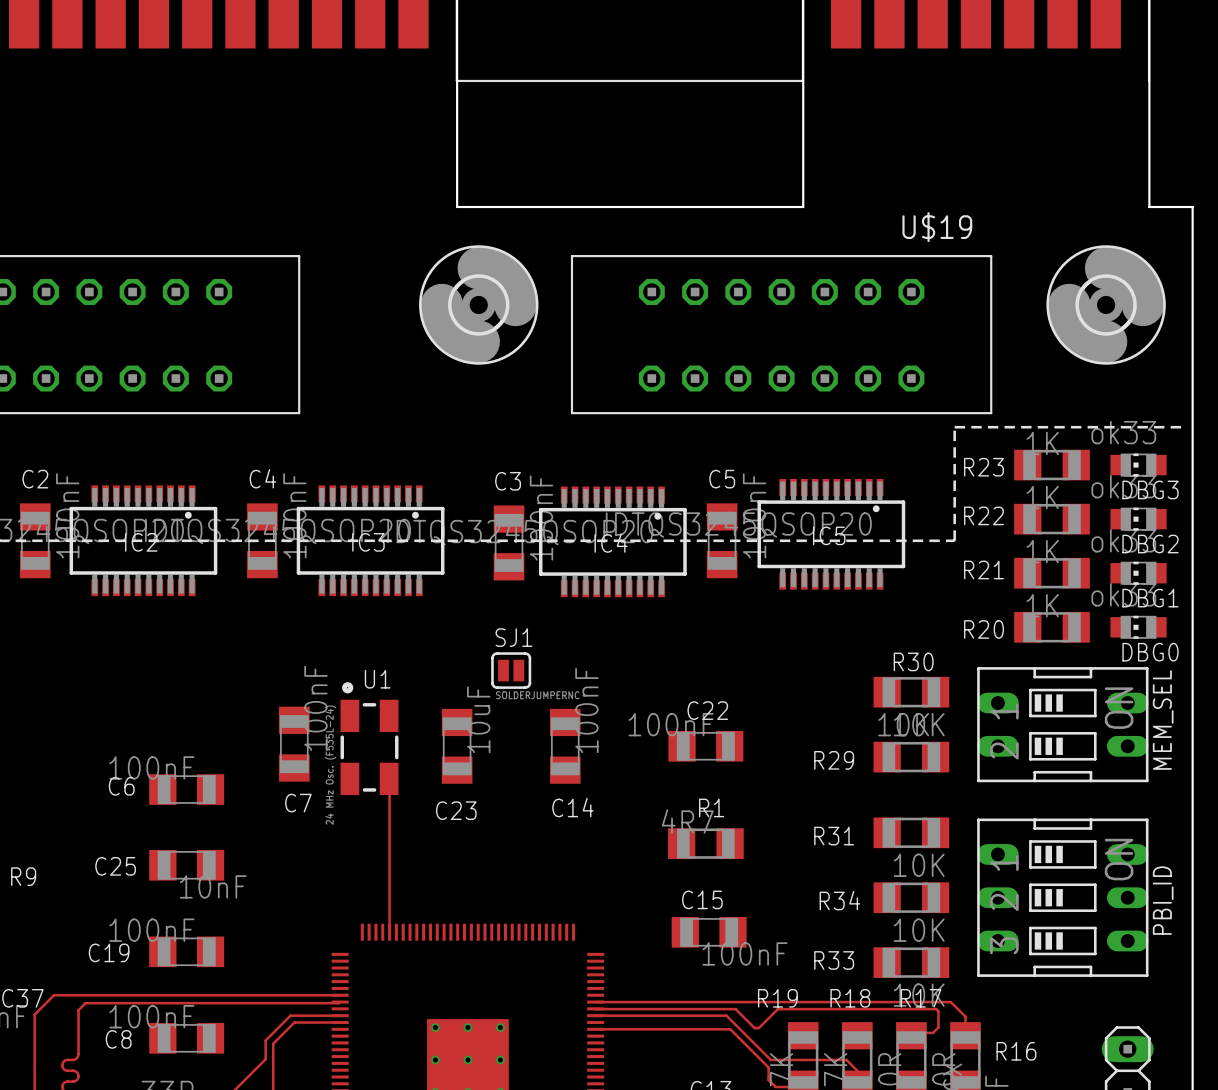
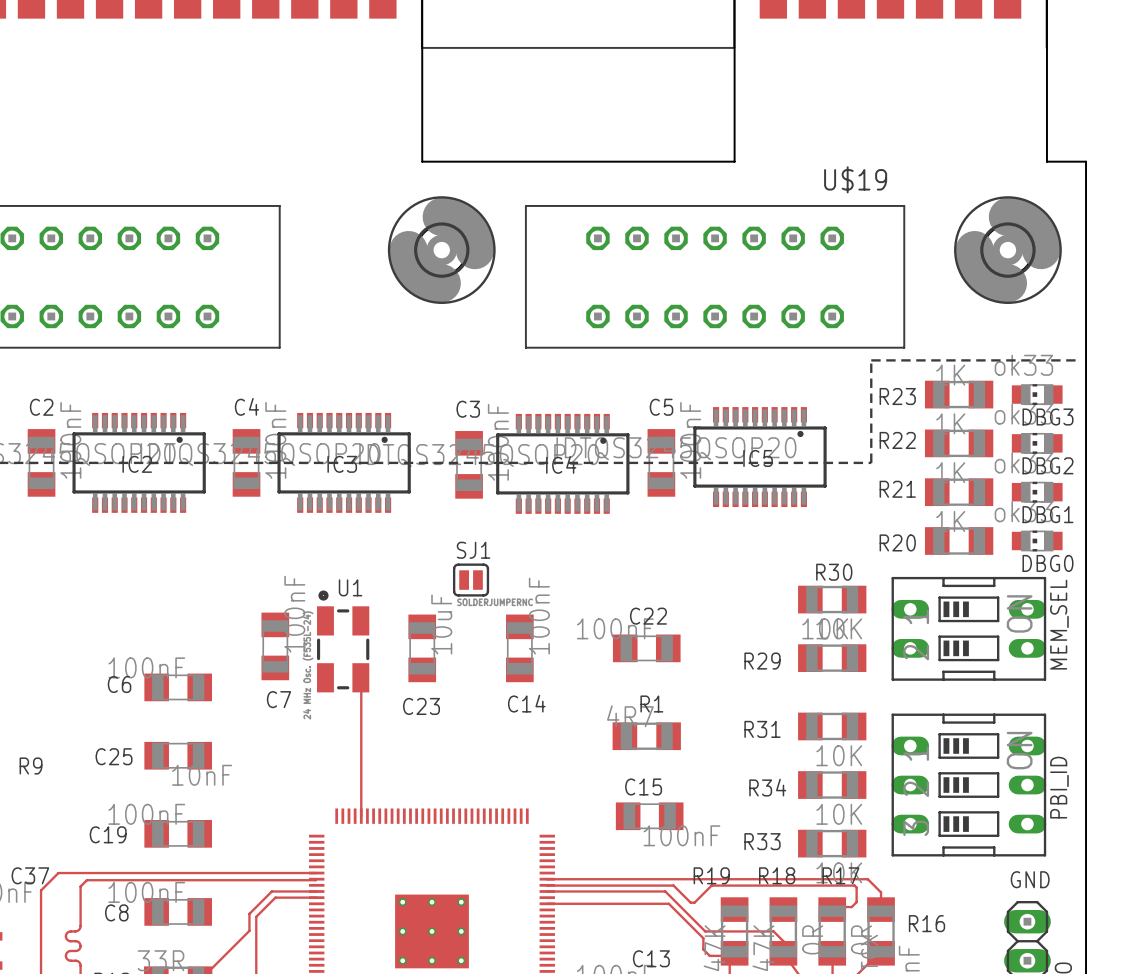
text: none -> GND (1030, 879)

